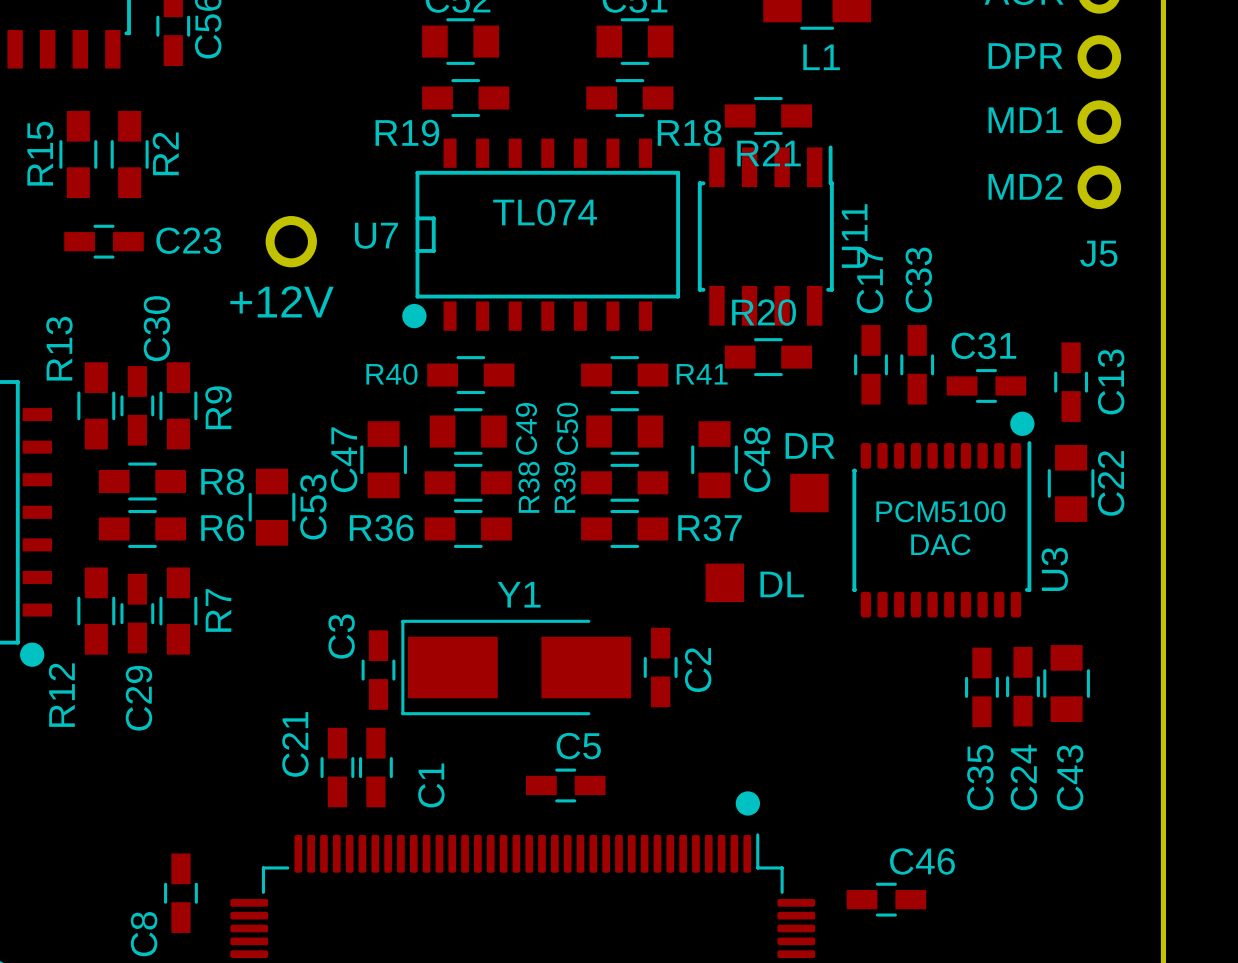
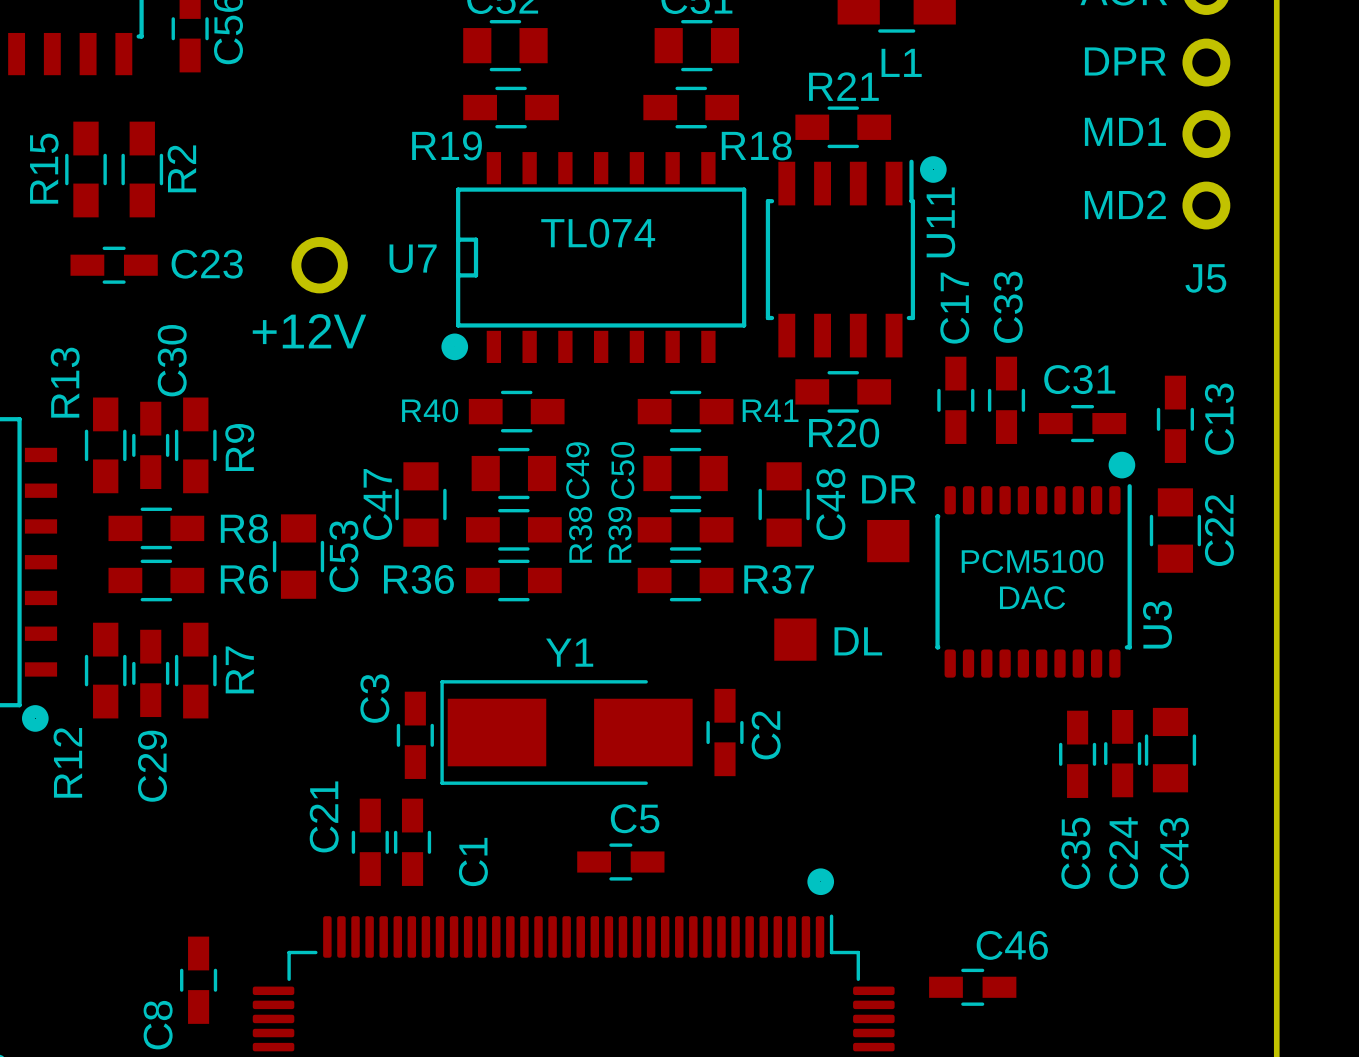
drawing: none -> [919, 156, 947, 183]
R21 name position: R21 (769, 153) -> R21 (843, 86)
U11 name position: U11 (854, 236) -> U11 (940, 222)
R20 name position: R20 (764, 312) -> R20 (844, 433)

